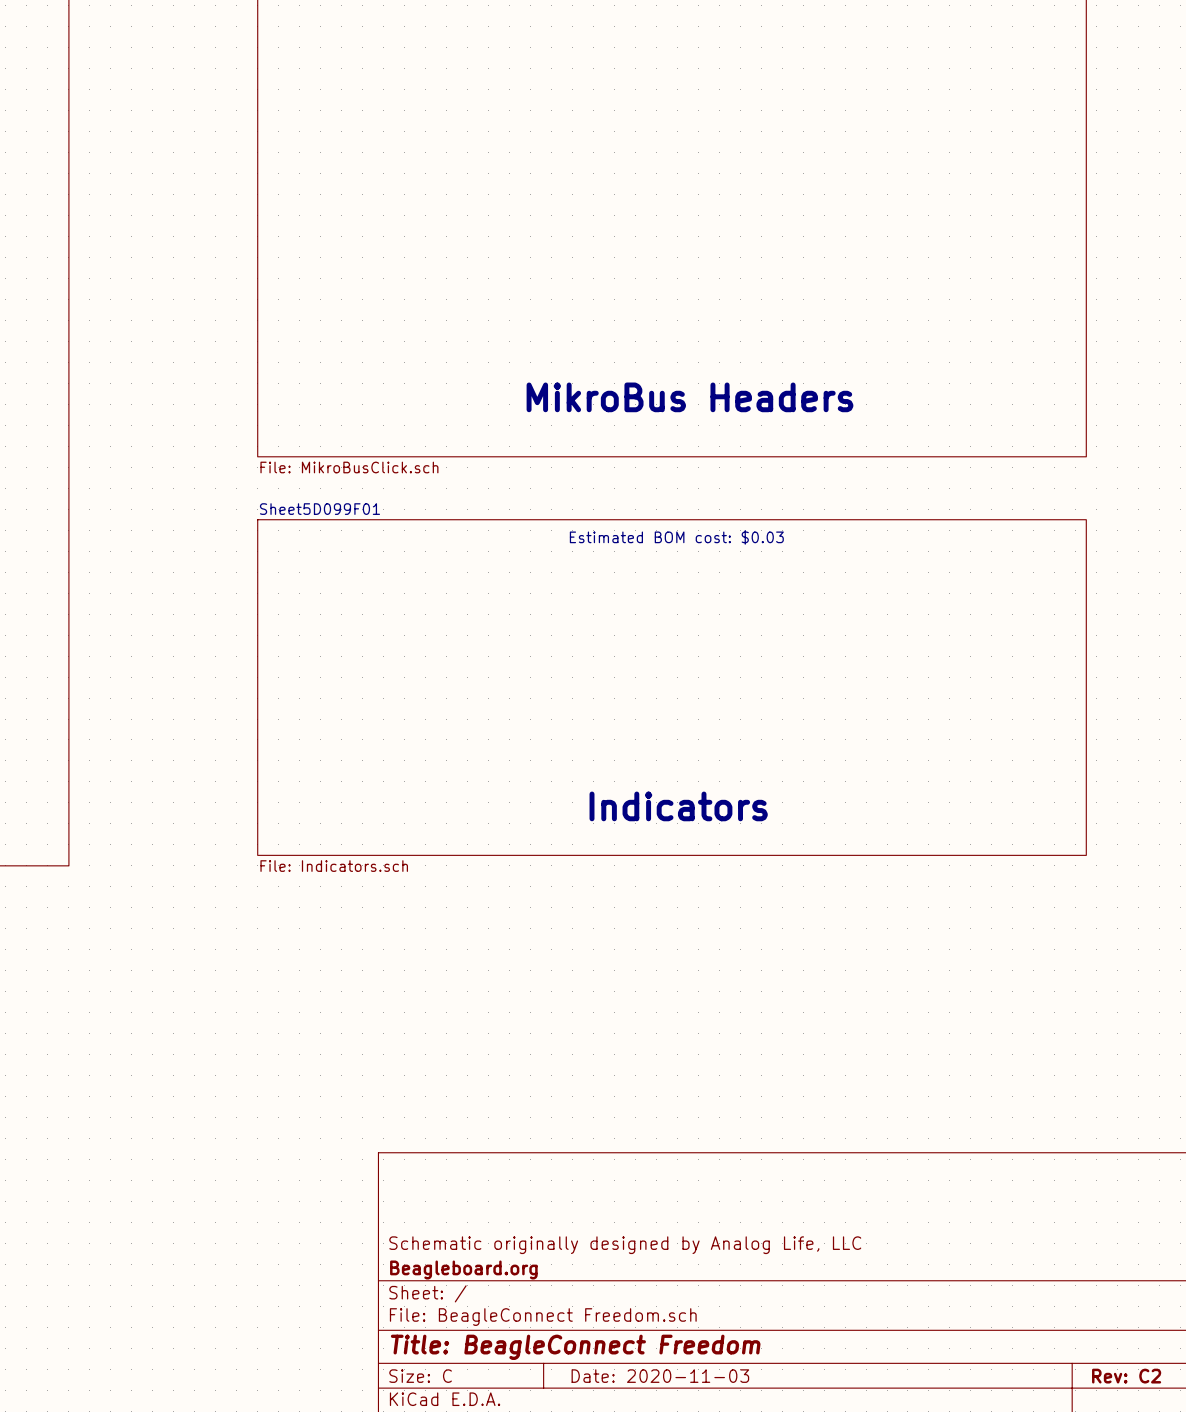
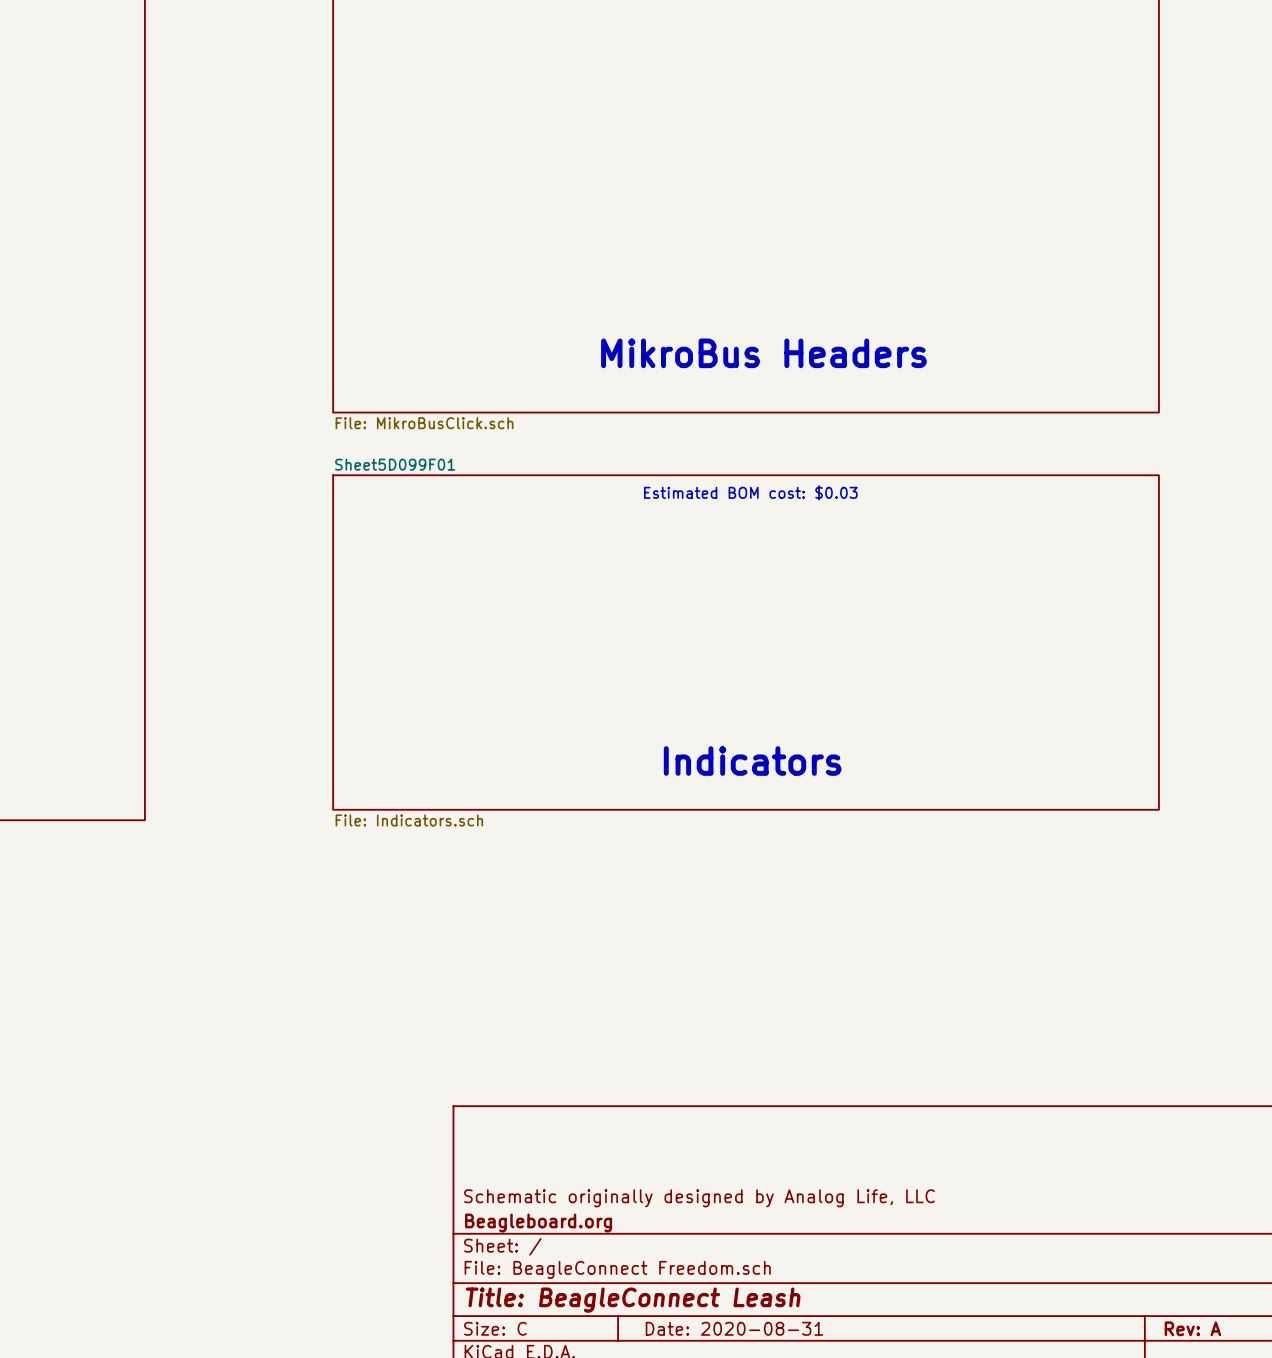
title block: Title: BeagleConnect Freedom (575, 1347) -> Title: BeagleConnect Leash (633, 1300)
title block: Date: 2020-11-03 (660, 1376) -> Date: 2020-08-31 (734, 1328)
title block: Rev: C2 (1126, 1376) -> Rev: A (1192, 1328)

